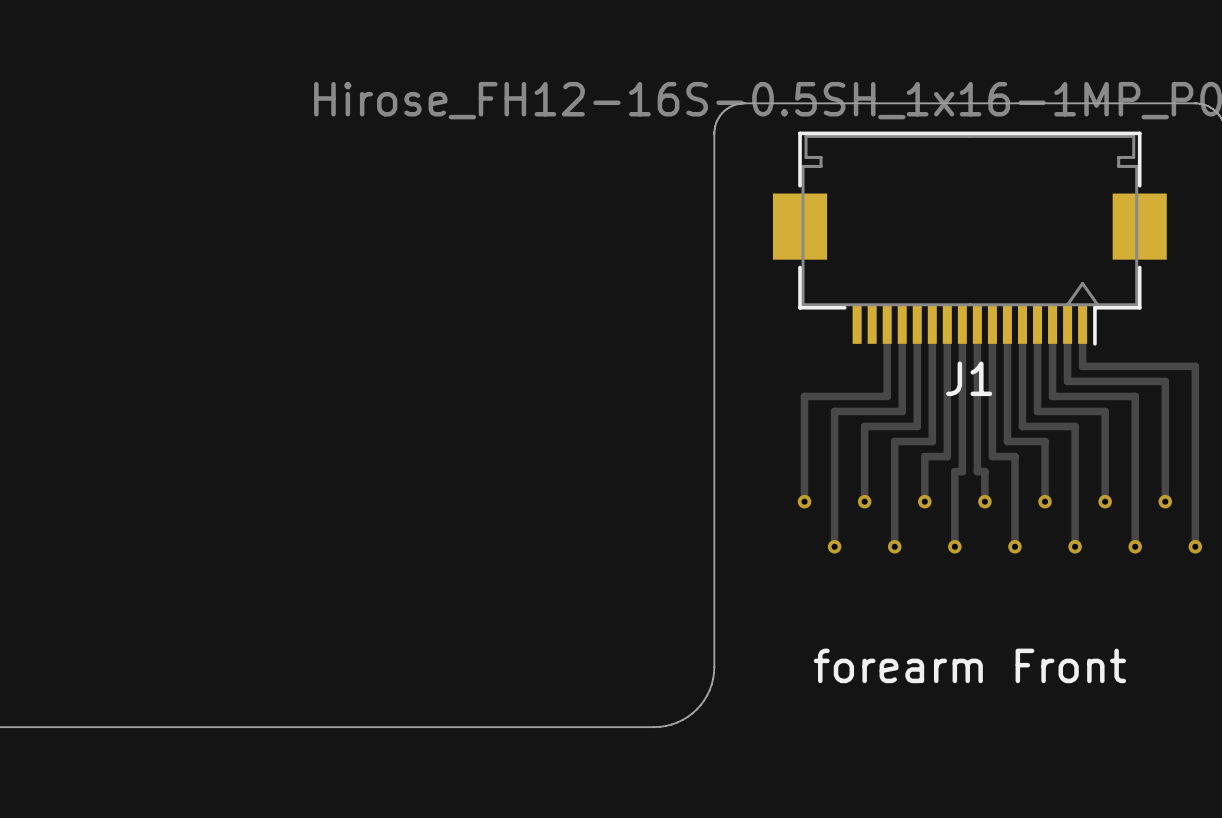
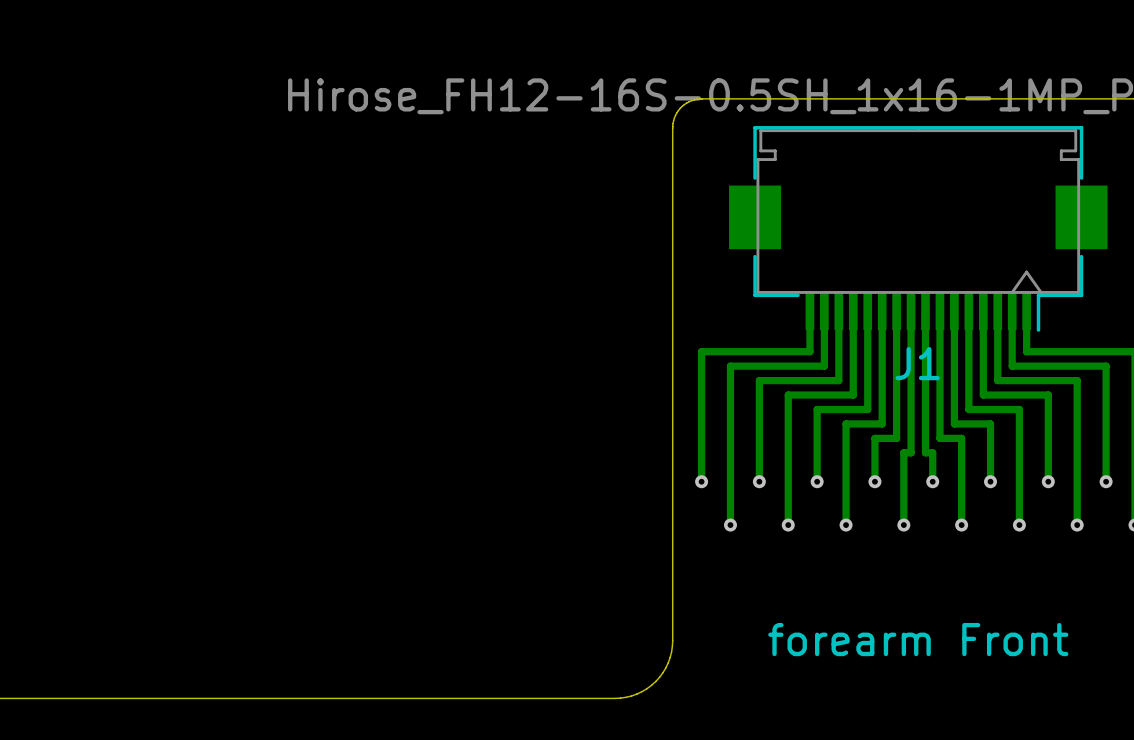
track: none -> (809, 311) (809, 351) (701, 351) (701, 481)
track: none -> (824, 311) (824, 366) (730, 366) (730, 525)
via: none -> (701, 481)
via: none -> (730, 525)

